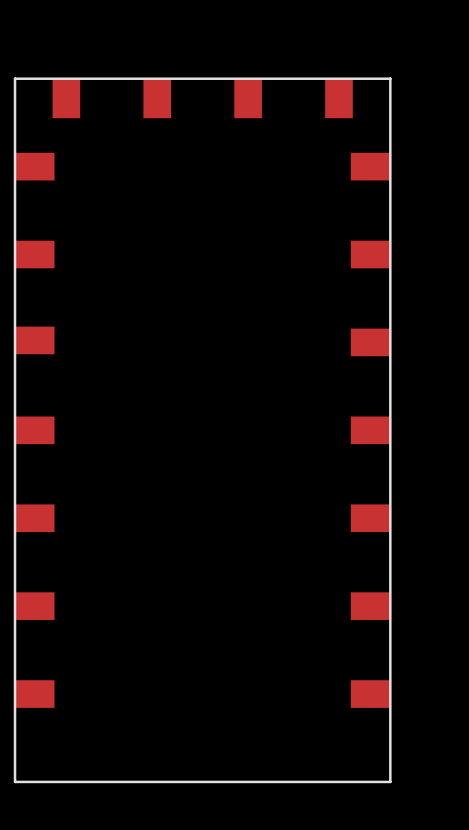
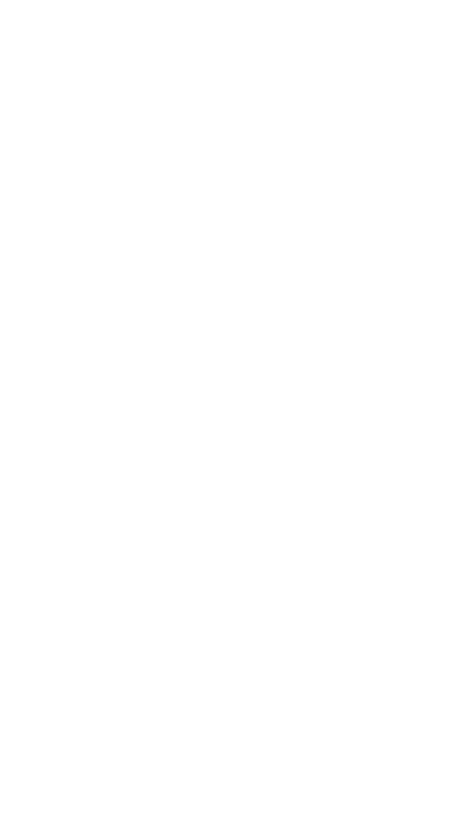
part: (202, 430) -> none

